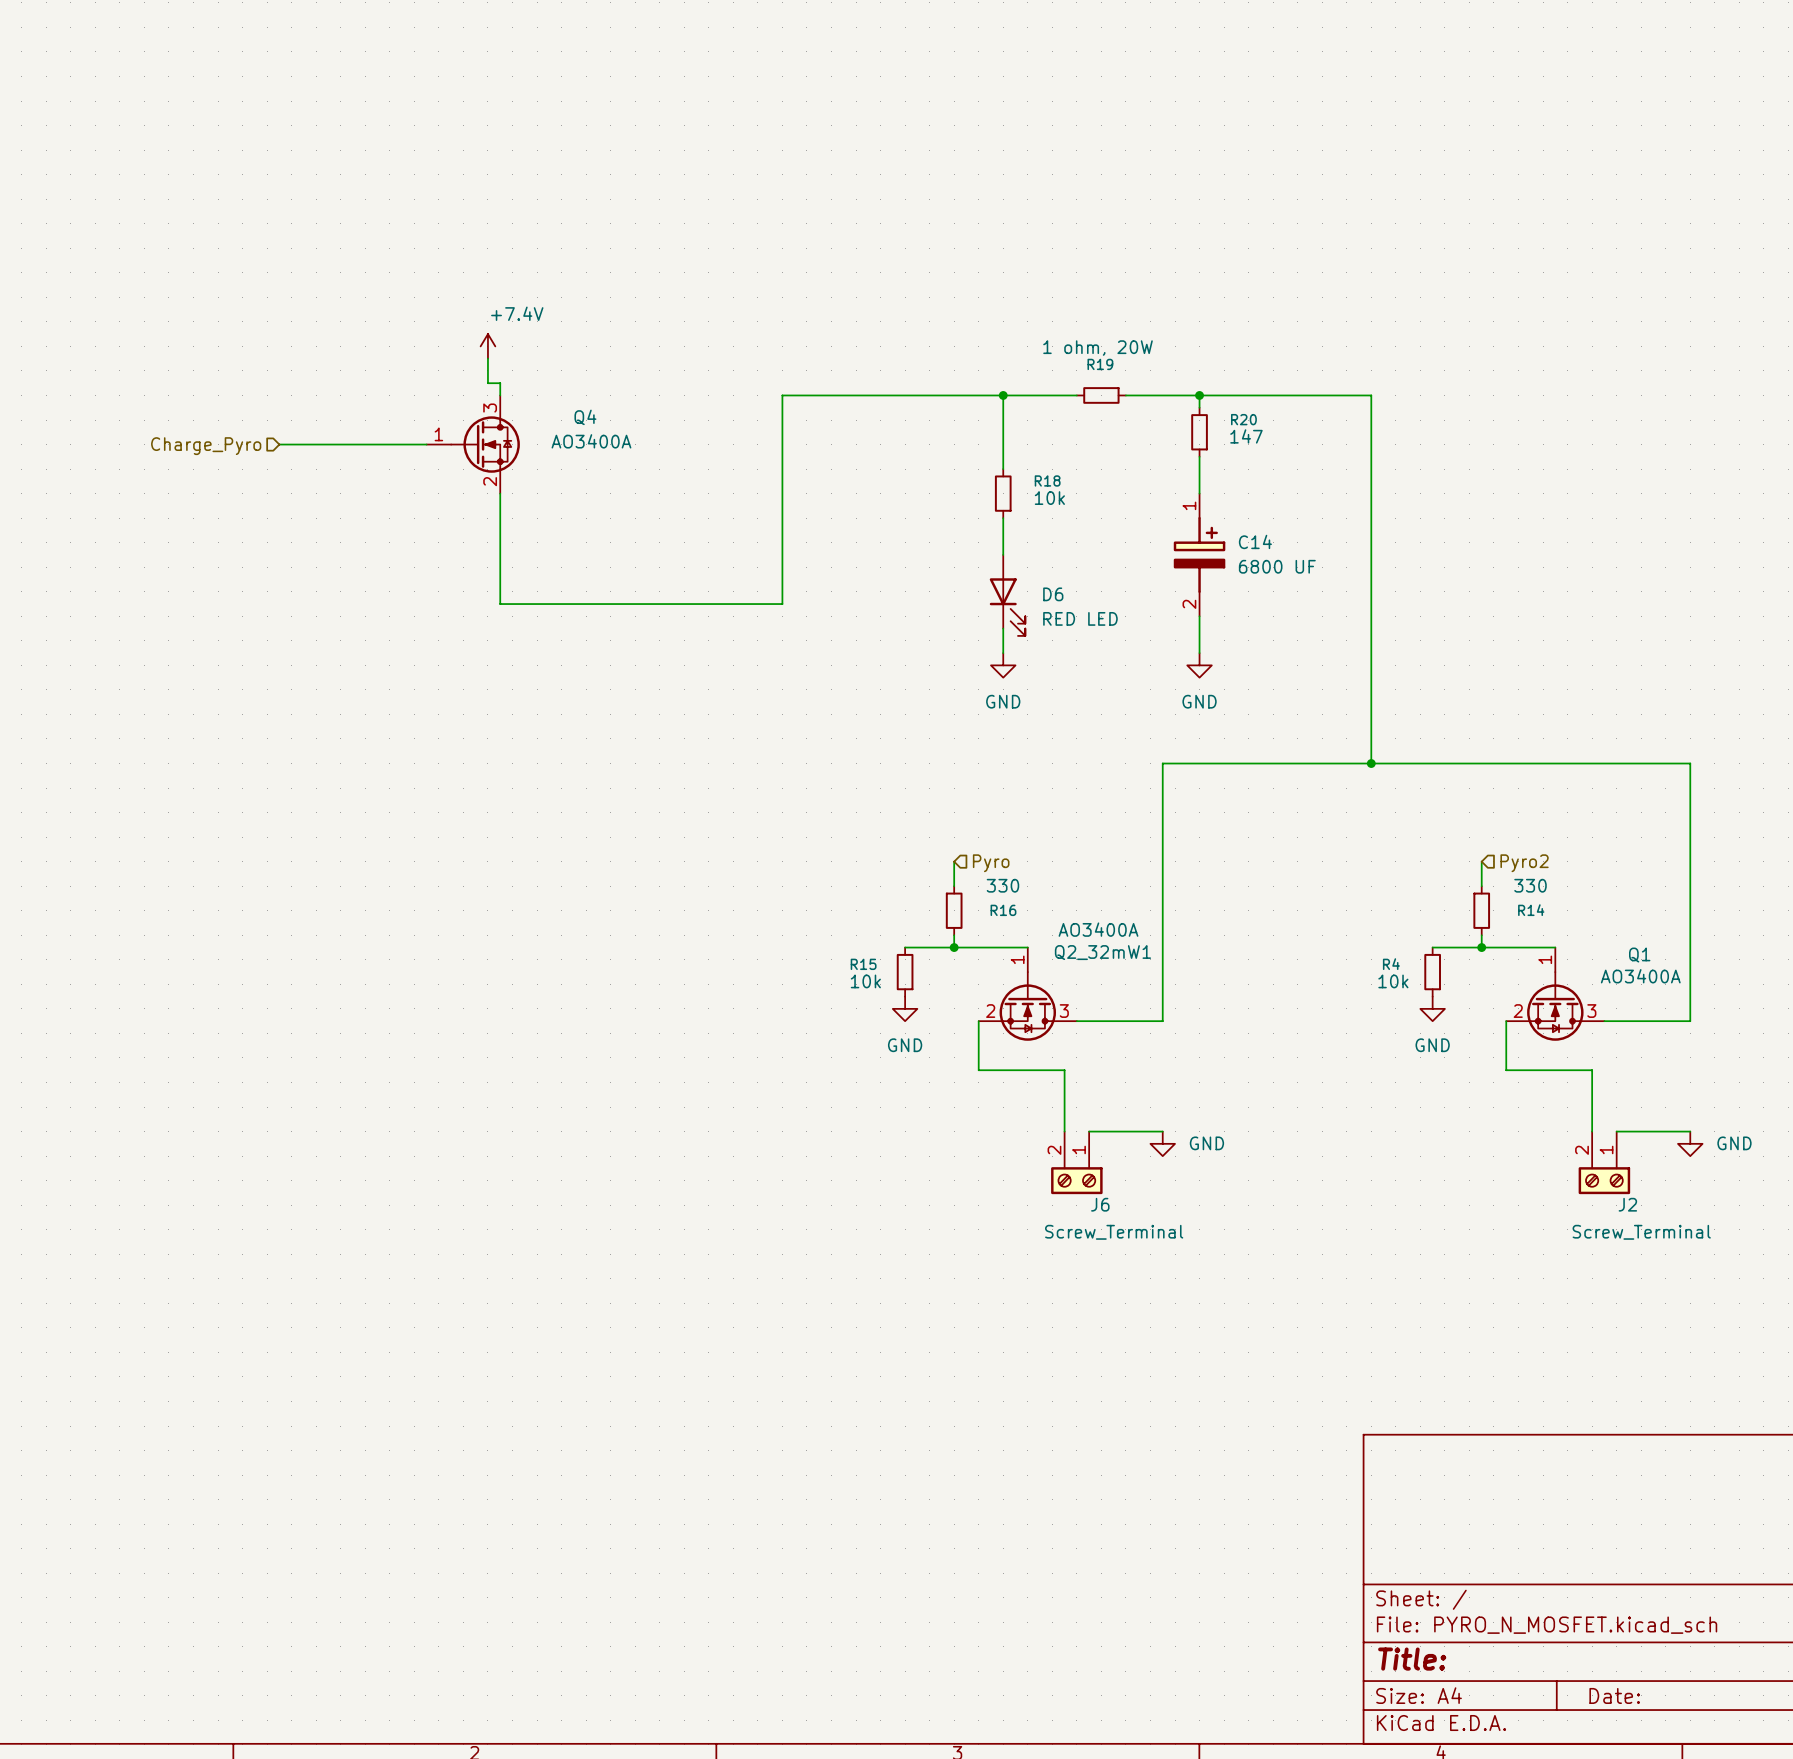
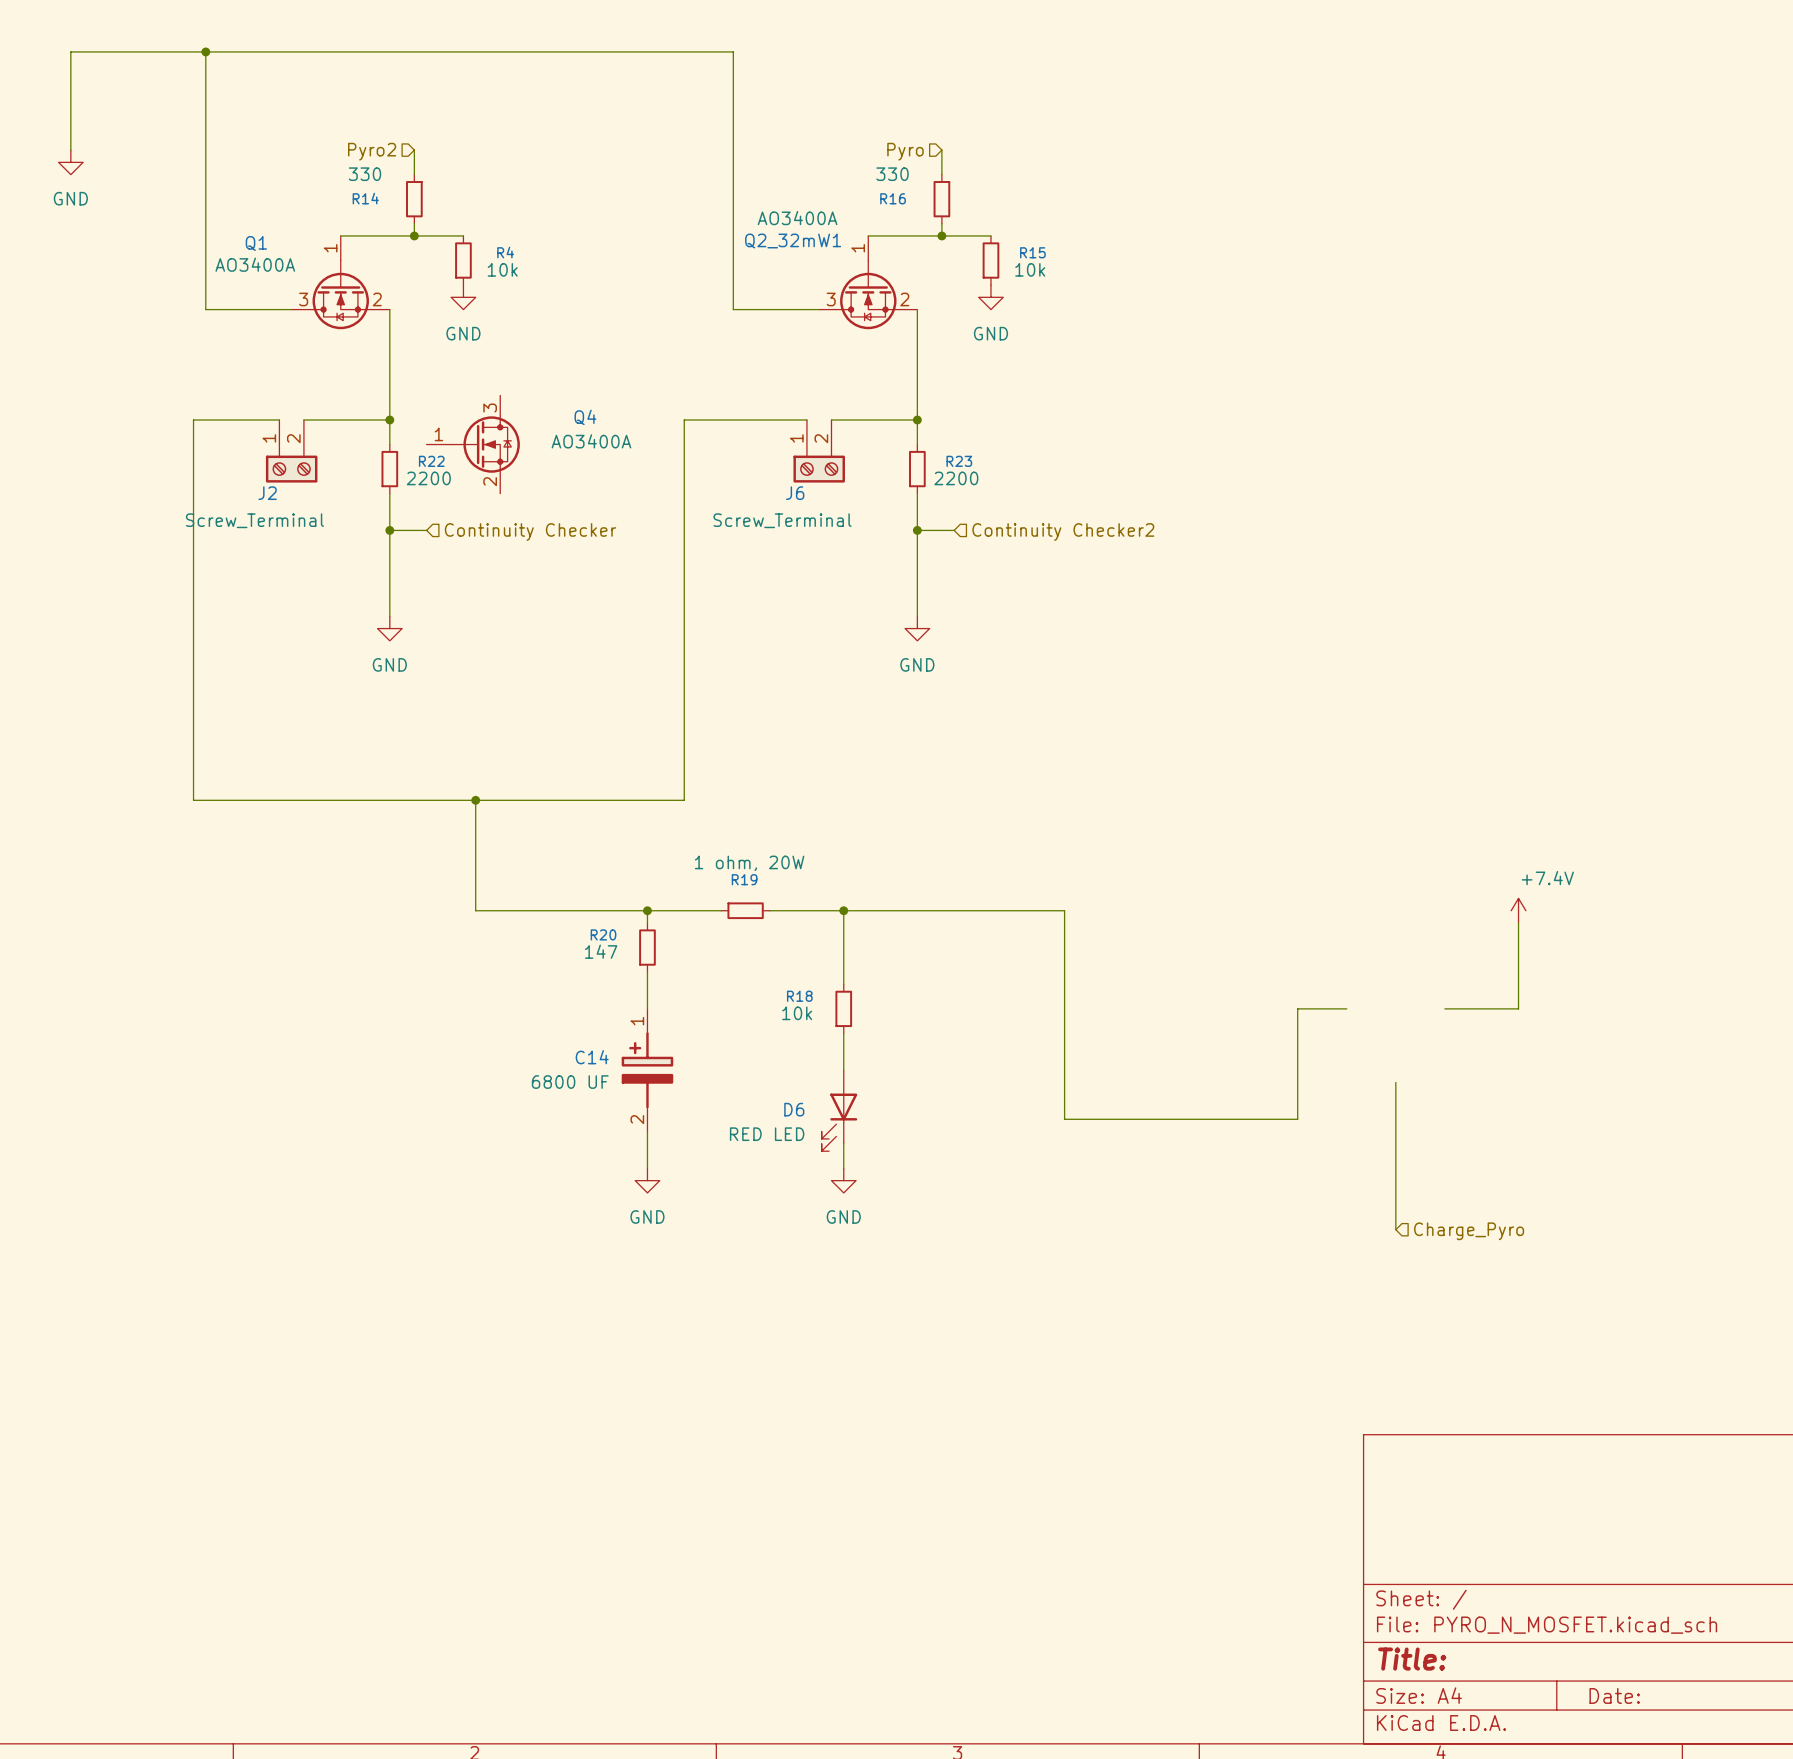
wire: none -> (205, 51) (205, 309) (291, 309)
junction: none -> (205, 51)
wire: none -> (70, 150) (70, 51) (733, 51) (733, 309) (819, 309)
wire: none -> (414, 150) (414, 174)
wire: none -> (941, 150) (941, 174)
hierarchical label: none -> Pyro2 (372, 151)
hierarchical label: none -> Pyro (905, 151)
power symbol: none -> GND (70, 162)
wire: none -> (414, 223) (414, 235)
wire: none -> (941, 223) (941, 235)
wire: none -> (340, 235) (463, 235)
junction: none -> (414, 235)
wire: none -> (868, 235) (990, 235)
junction: none -> (941, 235)
power symbol: none -> GND (463, 297)
power symbol: none -> GND (990, 297)
wire: none -> (389, 309) (389, 444)
wire: none -> (917, 309) (917, 444)
power symbol: +7.4V (487, 346) -> none
R19 value position: 1 ohm, 20W (1098, 348) -> 1 ohm, 20W (749, 863)
wire: (487, 358) (487, 383) (500, 383) (500, 395) -> none
wire: (1003, 395) (1003, 469) -> none
junction: (1003, 395) -> none
wire: (1076, 395) (782, 395) (782, 604) (500, 604) (500, 493) -> none
R19 position: (1101, 395) -> (745, 910)
wire: (1125, 395) (1371, 395) (1371, 763) -> none
wire: (1199, 395) (1199, 407) -> none
junction: (1199, 395) -> none
R20 name position: R20 (1243, 419) -> R20 (603, 934)
wire: none -> (279, 420) (193, 420) (193, 800) (684, 800) (684, 420) (806, 420)
wire: none -> (303, 420) (389, 420)
junction: none -> (389, 420)
wire: none -> (831, 420) (917, 420)
junction: none -> (917, 420)
R20 position: (1199, 432) -> (647, 947)
R20 value position: 147 (1246, 436) -> 147 (601, 951)
wire: (279, 444) (426, 444) -> none
hierarchical label: Charge_Pyro (206, 446) -> none
wire: (1199, 456) (1199, 493) -> none
R22: none -> 2200 (389, 469)
R23: none -> 2200 (917, 469)
R18 name position: R18 (1047, 480) -> R18 (799, 996)
wire: none -> (389, 493) (389, 616)
wire: none -> (917, 493) (917, 616)
R18 position: (1003, 493) -> (843, 1008)
R18 value position: 10k (1049, 498) -> 10k (797, 1013)
wire: (1003, 518) (1003, 554) -> none
wire: none -> (389, 530) (426, 530)
junction: none -> (389, 530)
wire: none -> (917, 530) (954, 530)
junction: none -> (917, 530)
hierarchical label: none -> Continuity Checker (530, 532)
hierarchical label: none -> Continuity Checker2 (1063, 532)
C14 flip: as is (1199, 554) -> left-right (647, 1070)
C14 position: (1199, 554) -> (647, 1070)
D6 position: (1007, 595) -> (839, 1110)
D6 flip: as is (1007, 607) -> left-right (839, 1122)
wire: (1199, 616) (1199, 653) -> none
power symbol: none -> GND (389, 628)
wire: (1003, 628) (1003, 653) -> none
power symbol position: GND (1003, 665) -> GND (917, 628)
power symbol: GND (1199, 665) -> none
junction: (1371, 763) -> none
wire: none -> (475, 800) (475, 910) (721, 910)
junction: none -> (475, 800)
wire: (954, 861) (954, 886) -> none
wire: (1481, 861) (1481, 886) -> none
hierarchical label: Pyro (991, 863) -> none
hierarchical label: Pyro2 (1524, 863) -> none
R16 value position: 330 (1002, 885) -> 330 (892, 174)
R14 value position: 330 (1530, 885) -> 330 (364, 174)
wire: none -> (647, 910) (647, 923)
junction: none -> (647, 910)
wire: none -> (843, 910) (843, 984)
junction: none -> (843, 910)
R16 position: (954, 910) -> (941, 199)
R16 name position: R16 (1003, 910) -> R16 (893, 198)
R14 position: (1481, 910) -> (414, 199)
power symbol: none -> +7.4V (1518, 910)
R14 name position: R14 (1531, 910) -> R14 (365, 198)
wire: none -> (1518, 923) (1518, 1008) (1444, 1008)
wire: (954, 935) (954, 947) -> none
wire: (1481, 935) (1481, 947) -> none
wire: (905, 947) (1027, 947) -> none
junction: (954, 947) -> none
wire: (1432, 947) (1555, 947) -> none
junction: (1481, 947) -> none
R15 name position: R15 (863, 964) -> R15 (1032, 252)
R4 name position: R4 (1391, 964) -> R4 (505, 252)
wire: none -> (647, 972) (647, 1008)
R15 position: (905, 972) -> (990, 260)
R4 position: (1432, 972) -> (463, 260)
R15 value position: 10k (865, 981) -> 10k (1030, 269)
R4 value position: 10k (1393, 981) -> 10k (502, 269)
Q2_32mW1 position: (1027, 994) -> (868, 282)
Q1 position: (1555, 994) -> (340, 282)
Q2_32mW1 flip: as is (1027, 1006) -> left-right (868, 294)
Q1 flip: as is (1555, 1006) -> left-right (340, 294)
power symbol: GND (905, 1008) -> none
power symbol: GND (1432, 1008) -> none
wire: (978, 1021) (978, 1070) (1064, 1070) -> (770, 910) (1064, 910) (1064, 1070)
wire: (1076, 1021) (1162, 1021) (1162, 763) (1690, 763) (1690, 1021) (1604, 1021) -> none
wire: (1506, 1021) (1506, 1070) (1592, 1070) (1592, 1131) -> none
wire: none -> (843, 1033) (843, 1070)
wire: none -> (1395, 1082) (1395, 1229)
wire: (1064, 1119) (1064, 1131) -> (1064, 1119) (1297, 1119) (1297, 1008) (1346, 1008)
wire: none -> (647, 1131) (647, 1168)
wire: (1089, 1131) (1162, 1131) -> none
wire: (1616, 1131) (1690, 1131) -> none
wire: none -> (843, 1143) (843, 1168)
power symbol: GND (1162, 1143) -> none
power symbol: GND (1690, 1143) -> none
J6 position: (1076, 1162) -> (819, 451)
J2 position: (1604, 1162) -> (291, 451)
power symbol: none -> GND (647, 1180)
power symbol: none -> GND (843, 1180)
J6 flip: as is (1076, 1180) -> left-right (819, 469)
J2 flip: as is (1604, 1180) -> left-right (291, 469)
hierarchical label: none -> Charge_Pyro (1469, 1231)

